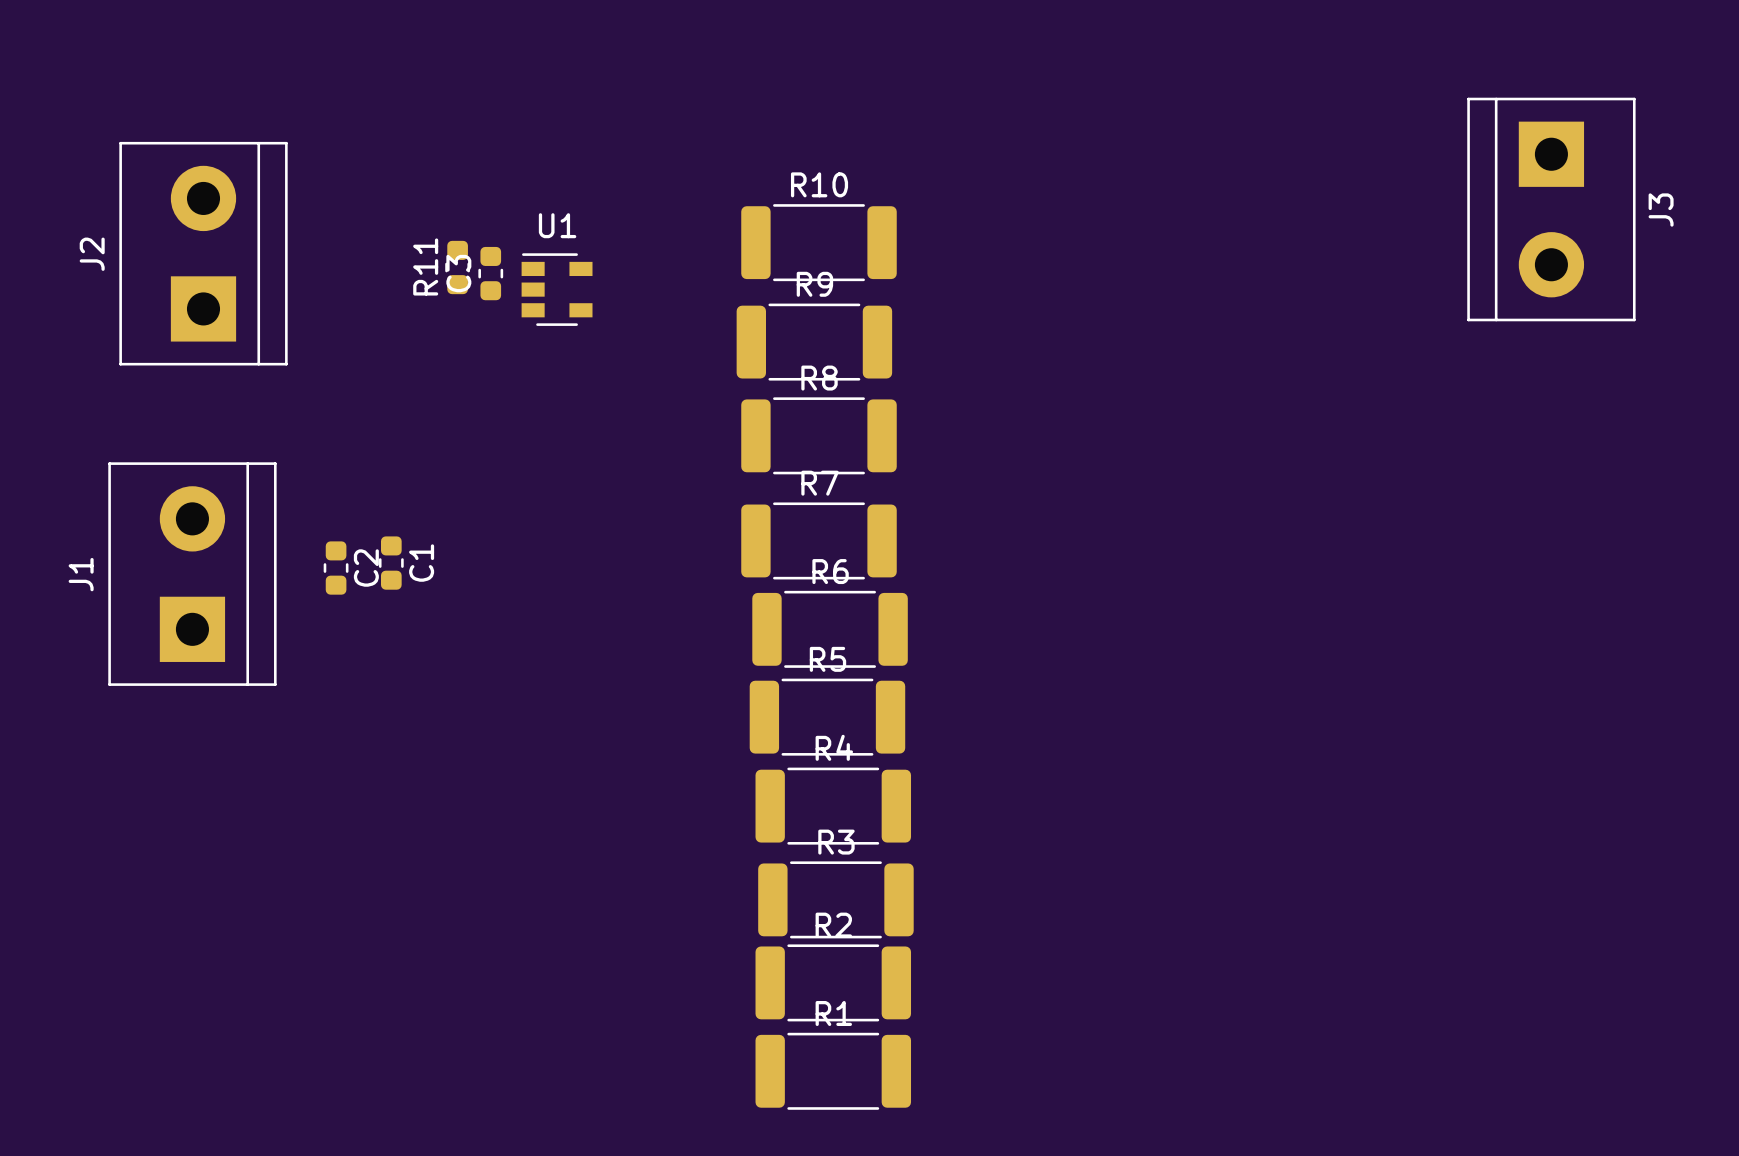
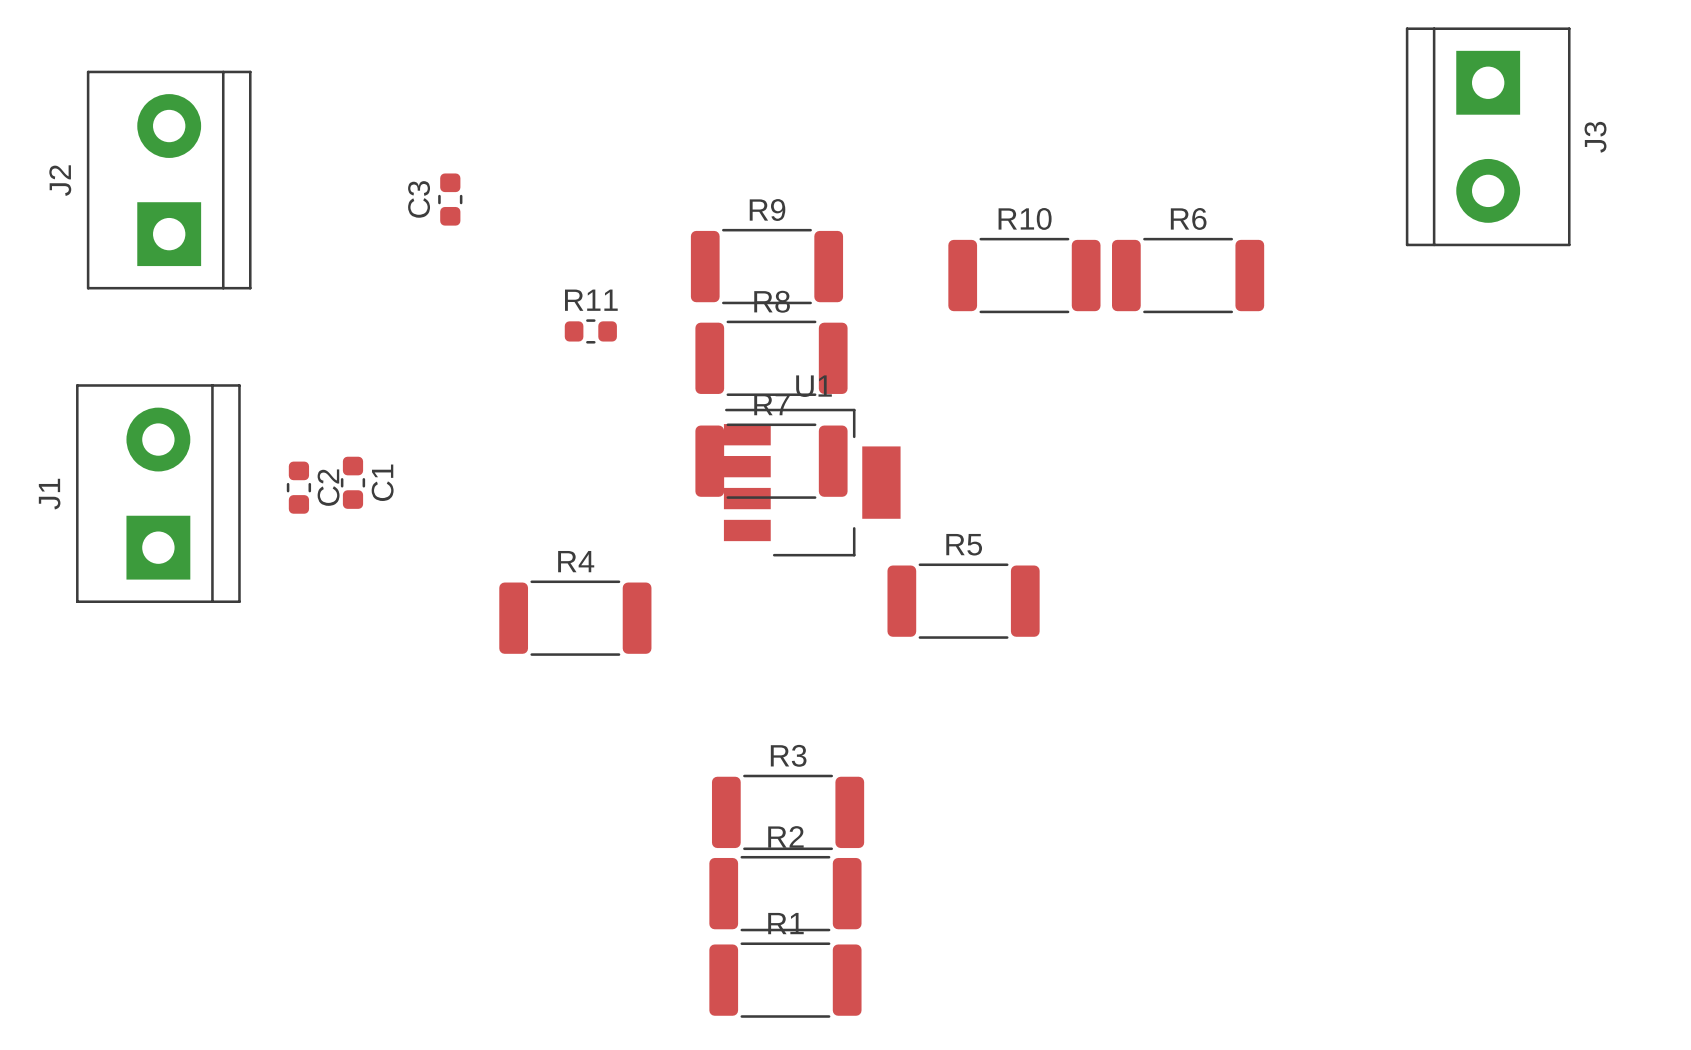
R10 position: (819, 242) -> (1024, 275)
U1 footprint: [521, 253, 593, 326] -> [723, 408, 901, 557]
R11 rotation: 0° (457, 267) -> 90° clockwise (590, 331)
R11 position: (457, 267) -> (590, 331)
R6 position: (830, 629) -> (1188, 275)
R5 position: (827, 717) -> (963, 601)
R4 position: (833, 806) -> (575, 618)

